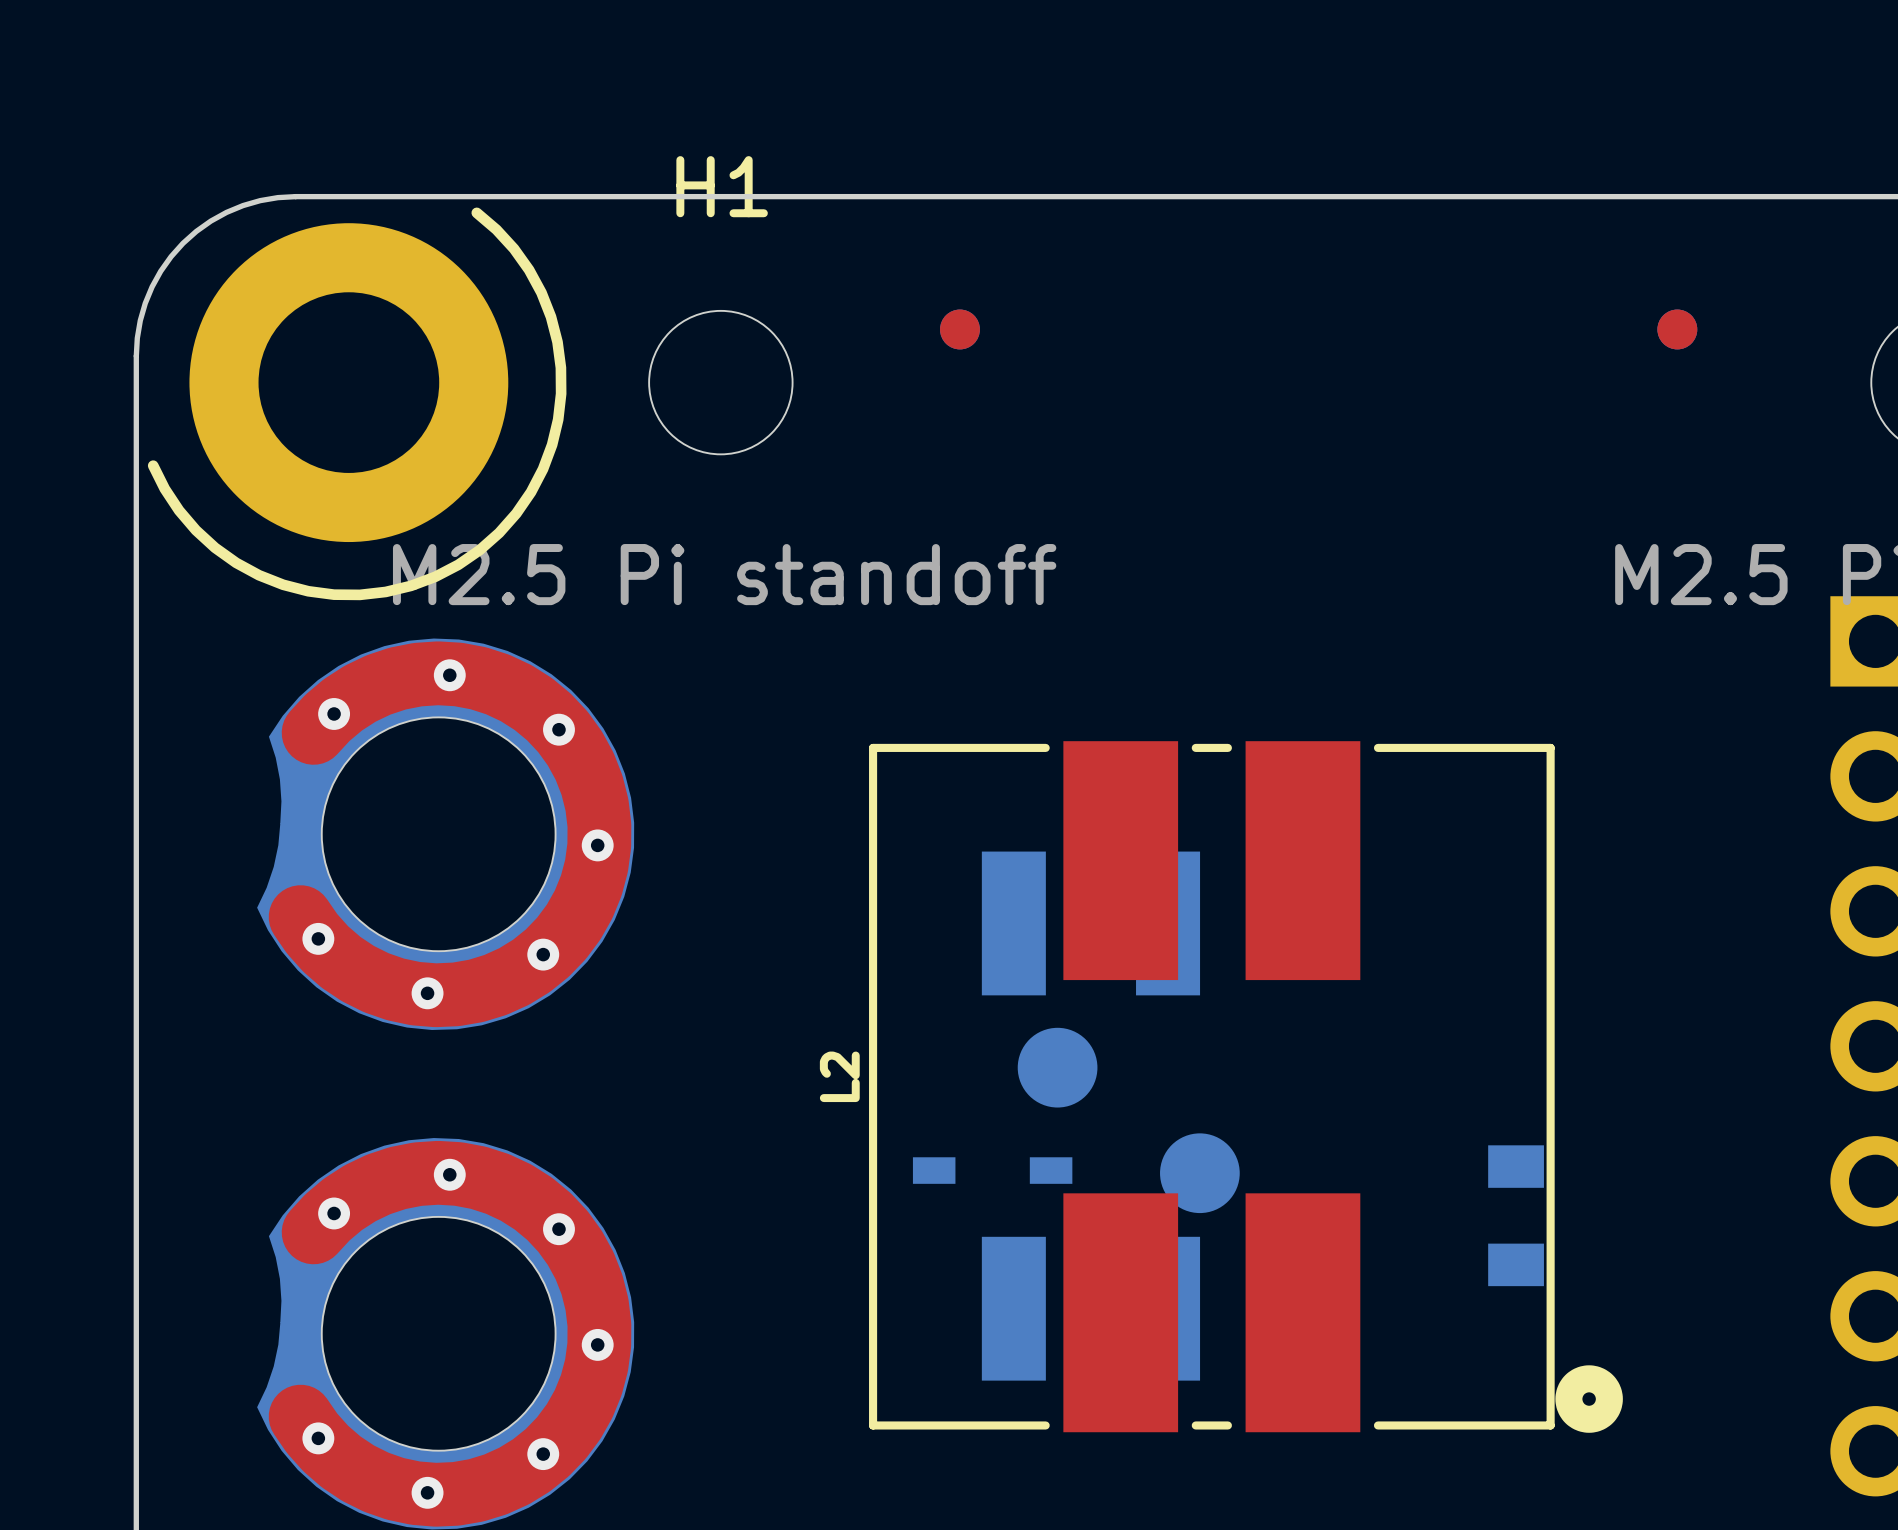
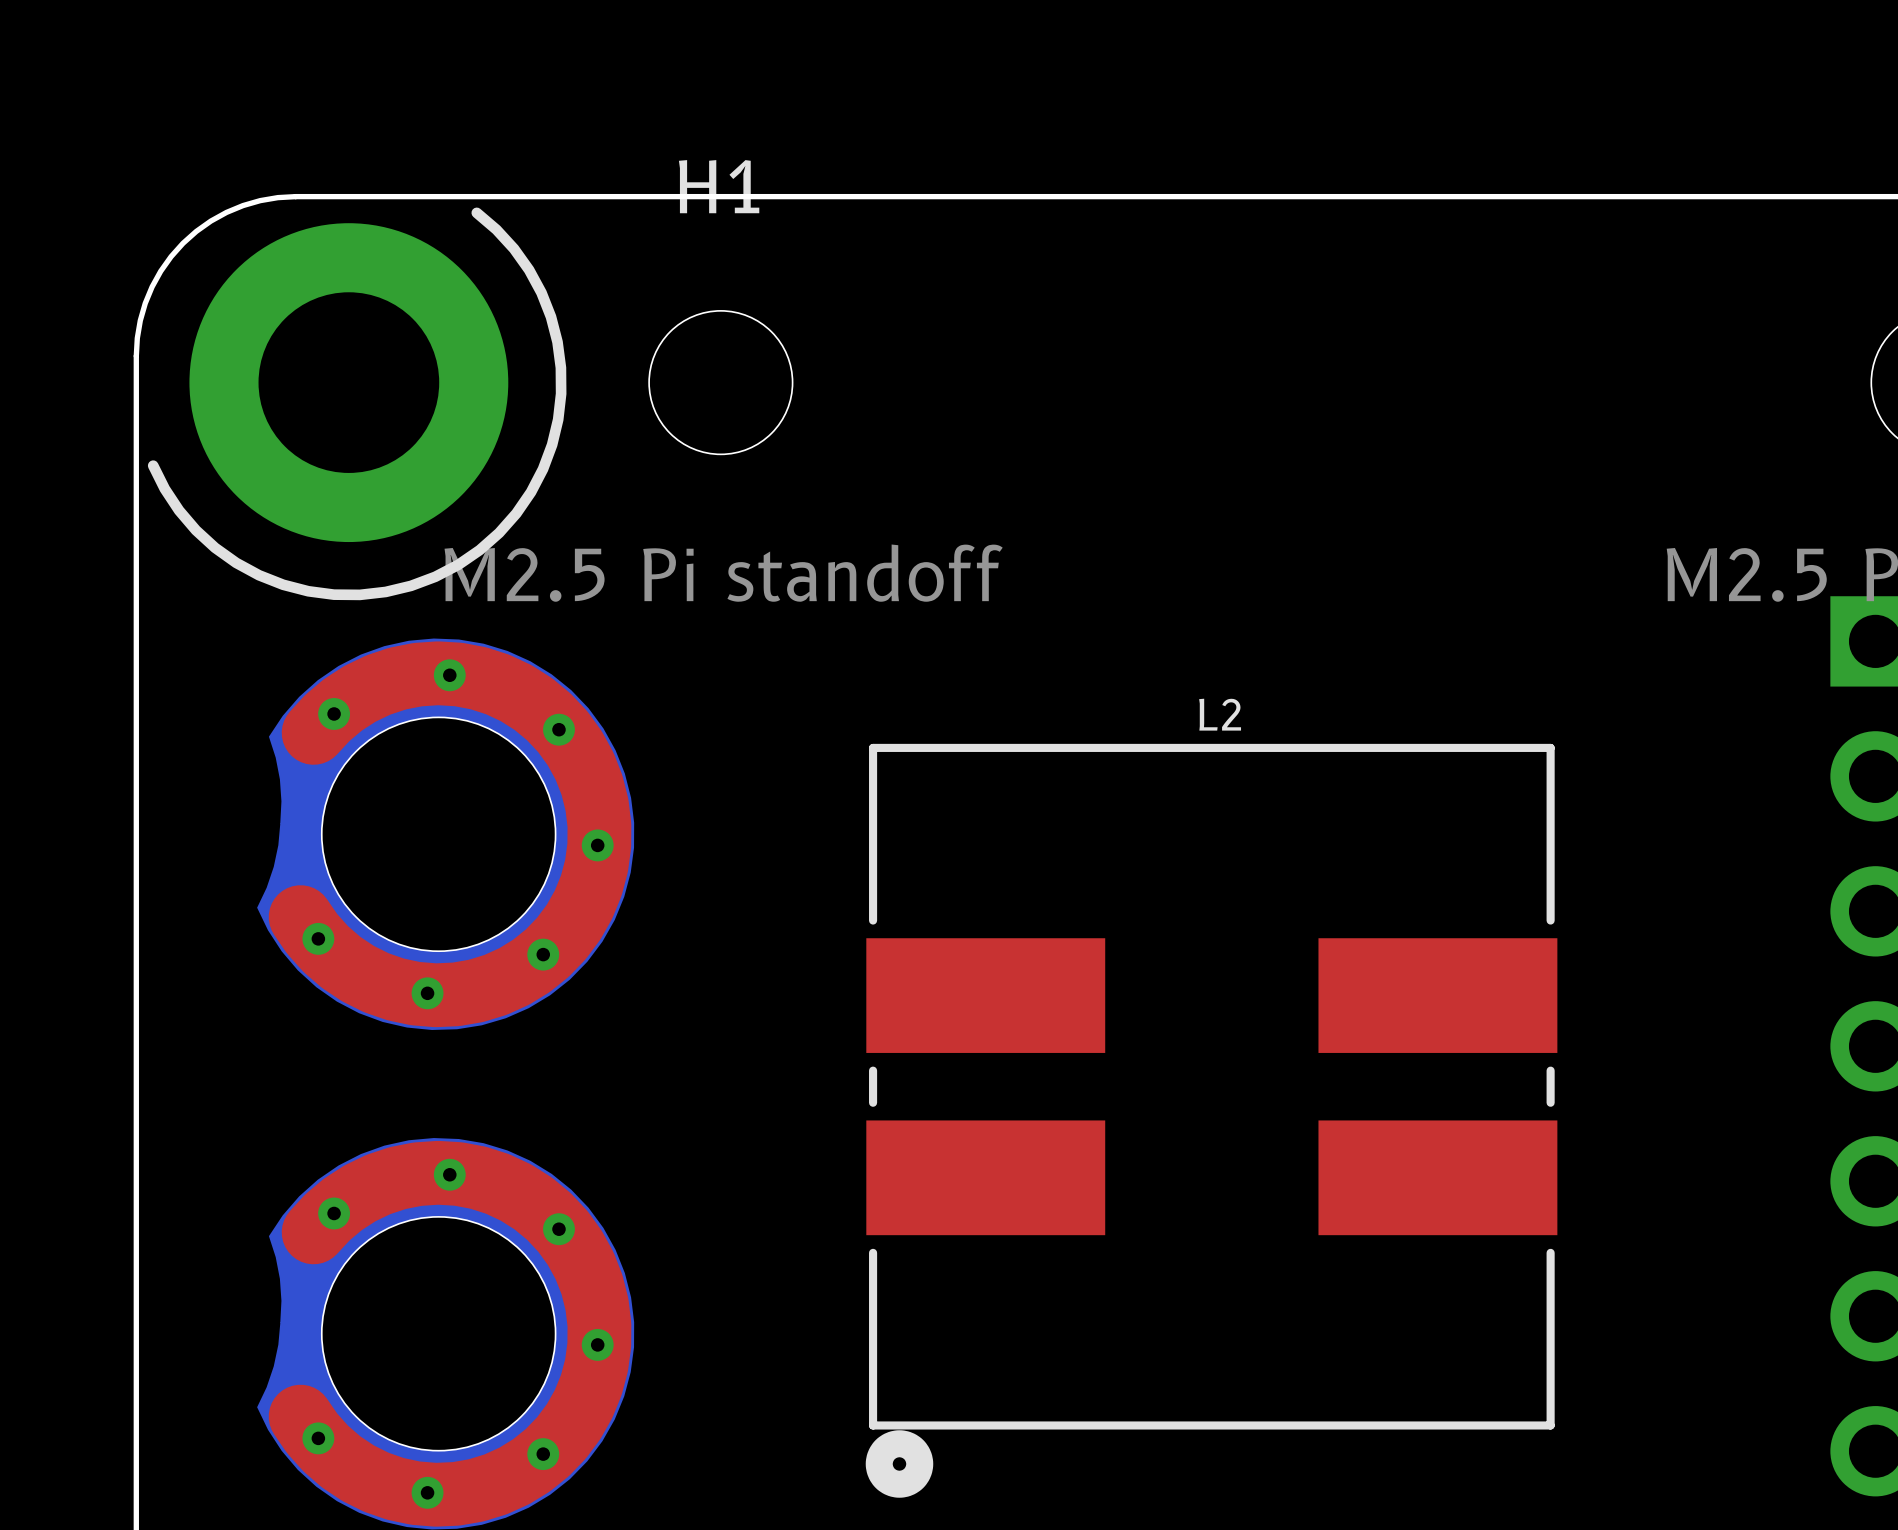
part: (959, 329) -> none
part: (1677, 329) -> none
part: (1090, 923) -> none
part: (1057, 1067) -> none
L2 rotation: 0° (1245, 1086) -> 90° clockwise (1211, 1120)
part: (992, 1170) -> none
part: (1199, 1173) -> none
part: (1516, 1215) -> none
part: (1090, 1308) -> none

